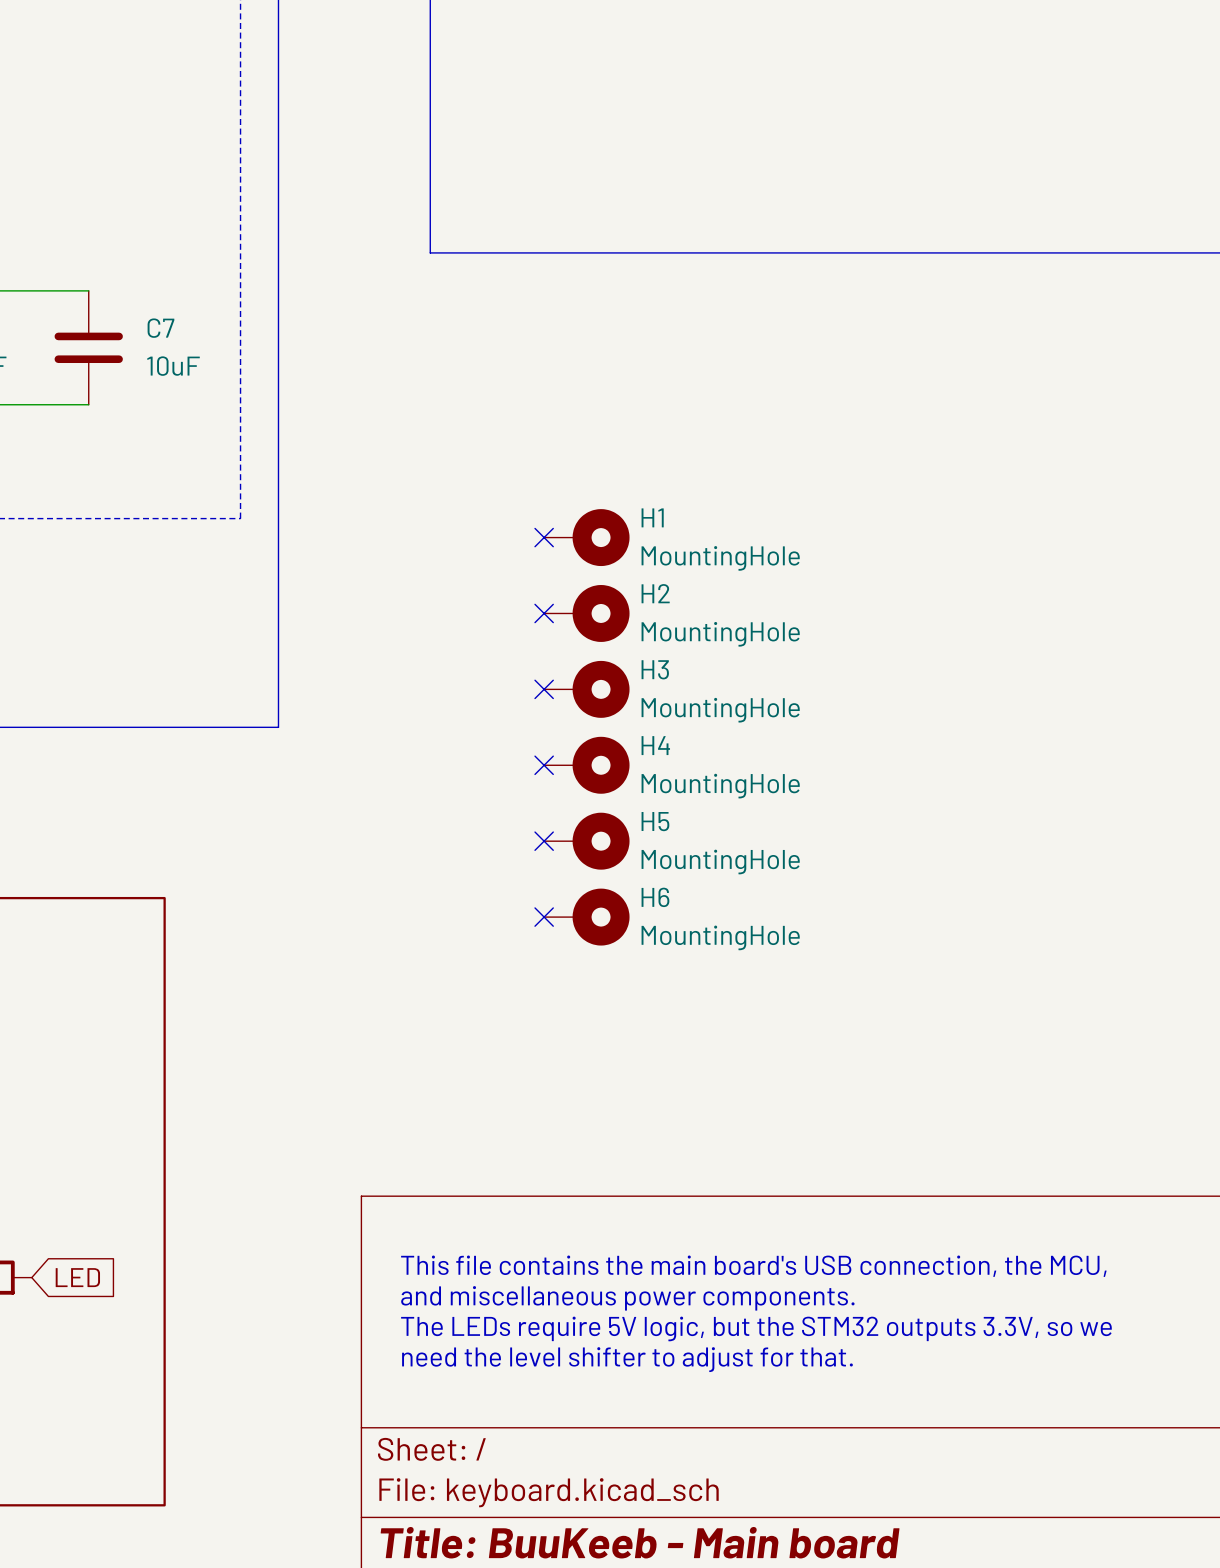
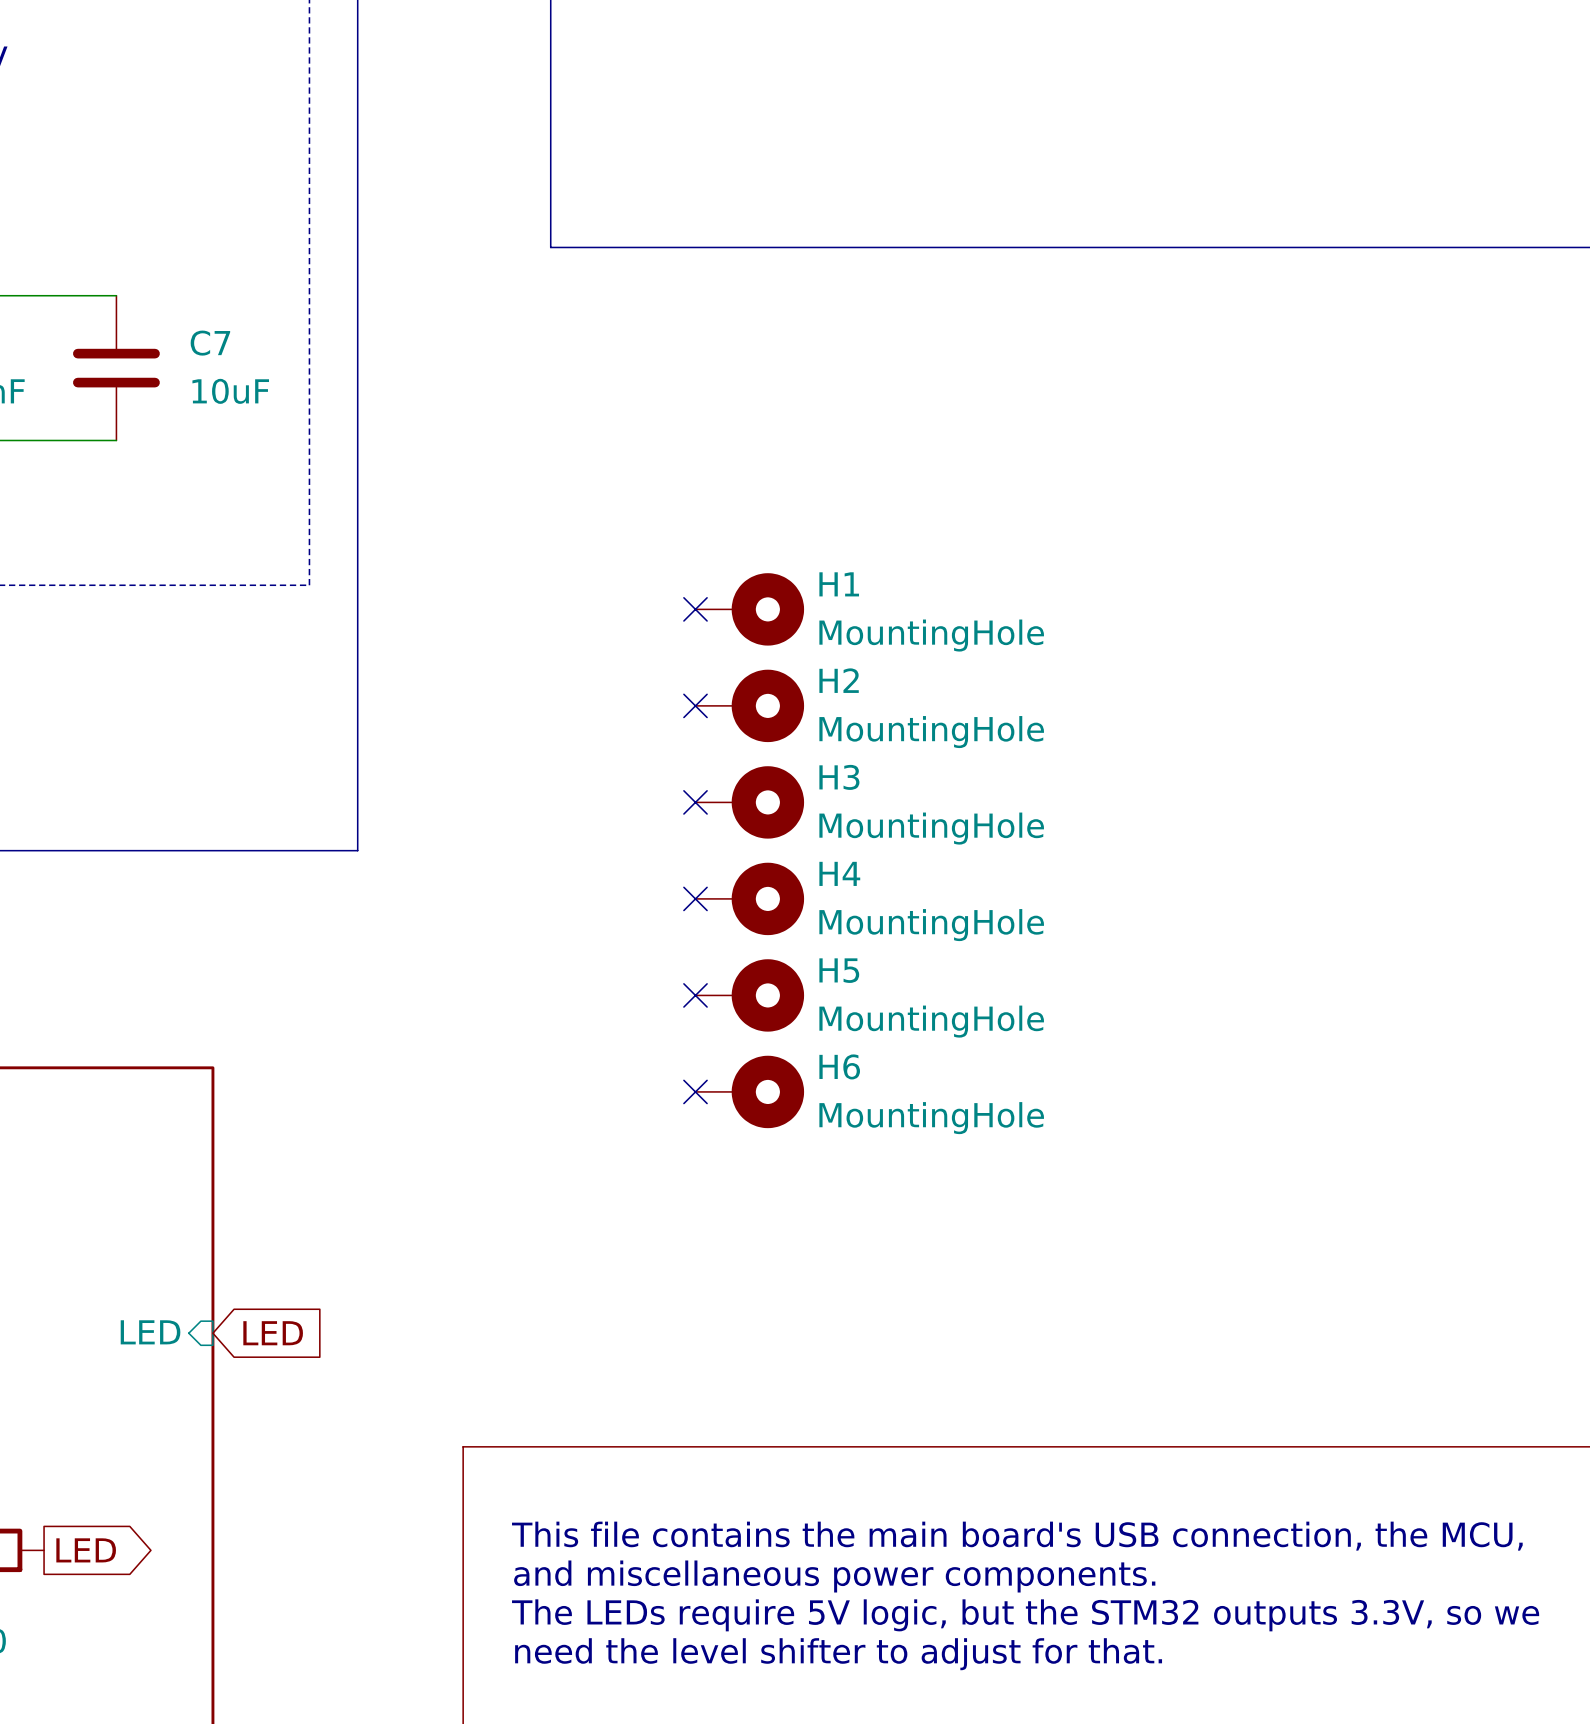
sheet pin: none -> LED (150, 1332)
global label: none -> LED (273, 1333)
global label shape: input (77, 1277) -> output (86, 1550)

